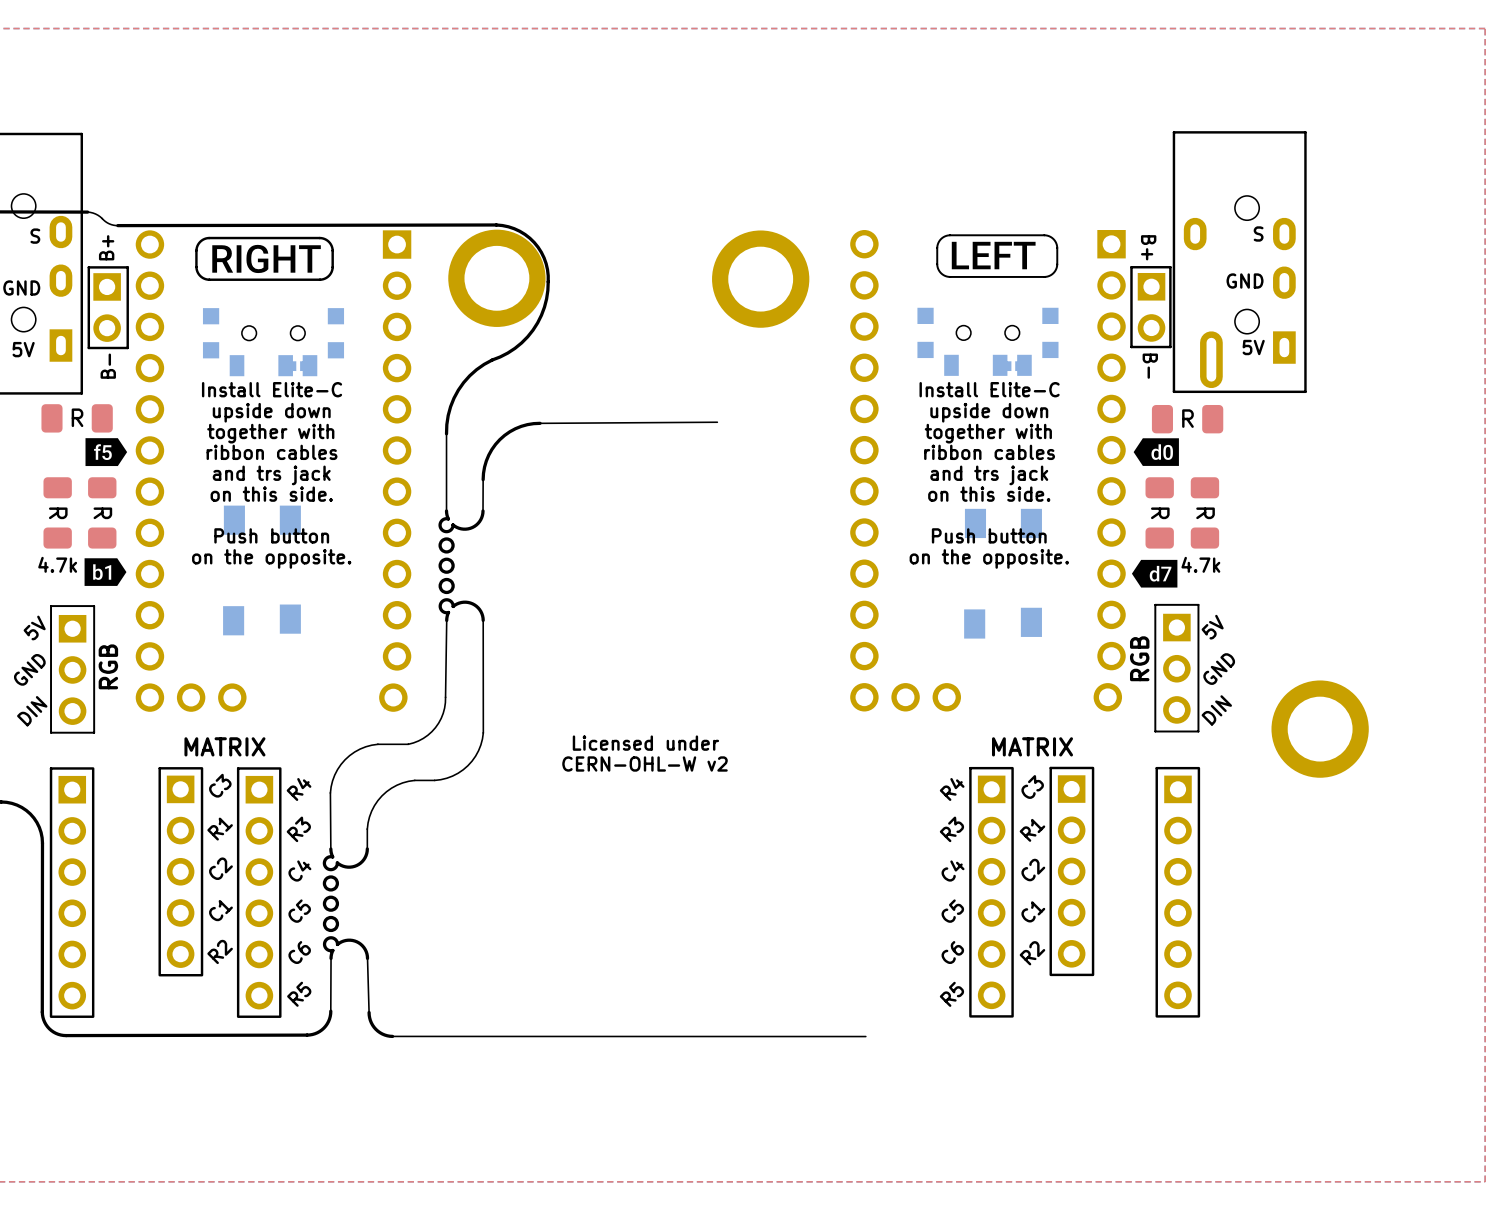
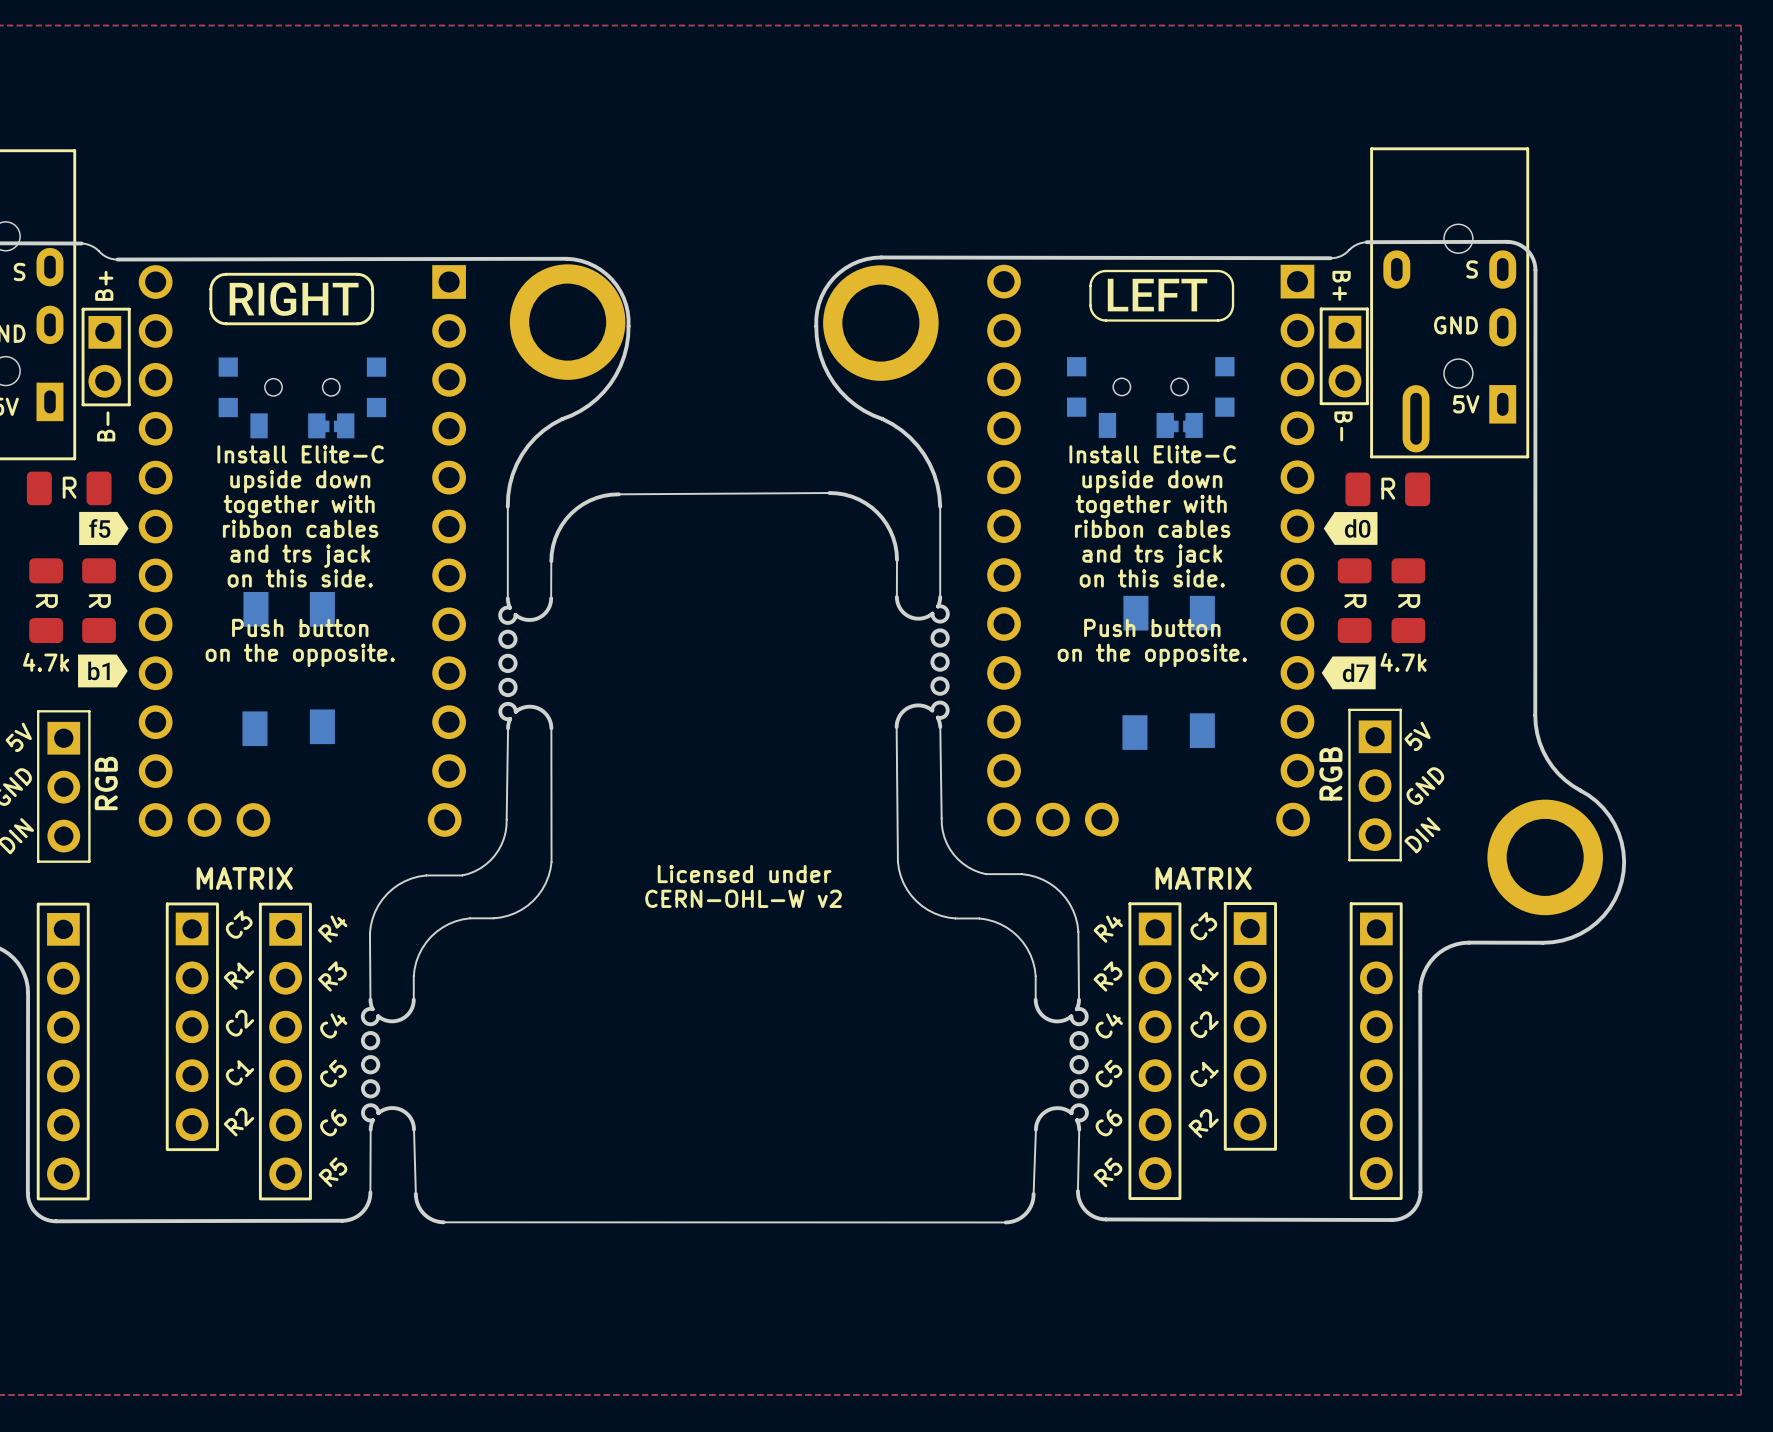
board edge: none -> (829, 493) (844, 494) (865, 503) (877, 512) (886, 524) (895, 544) (897, 599) (902, 611) (914, 618) (922, 618) (932, 613) (937, 621) (945, 619) (947, 610) (942, 606) (938, 606) (940, 597) (939, 495) (929, 464) (917, 445) (901, 430) (864, 410) (840, 391) (828, 375) (818, 346) (816, 318) (821, 296) (829, 283) (839, 272) (859, 261) (881, 257) (1330, 258) (1340, 256) (1354, 245) (1366, 242) (1507, 241) (1524, 247) (1534, 262) (1535, 724) (1539, 742) (1552, 766) (1565, 780) (1588, 795) (1603, 808) (1618, 833) (1623, 852) (1623, 871) (1614, 899) (1596, 922) (1571, 937) (1552, 942) (1456, 944) (1439, 952) (1426, 967) (1421, 978) (1420, 991) (1420, 1195) (1414, 1209) (1404, 1217) (1392, 1220) (1106, 1219) (1096, 1217) (1083, 1208) (1078, 1194) (1079, 1129) (1077, 1120) (1084, 1118) (1086, 1112) (1084, 1107) (1079, 1105) (1074, 1107) (1071, 1113) (1061, 1108) (1050, 1109) (1043, 1113) (1038, 1119) (1036, 1127) (1032, 1203) (1023, 1216) (1014, 1220) (1005, 1222)
round board edge: none -> [930, 628, 950, 648]
round board edge: none -> [930, 652, 950, 672]
round board edge: none -> [930, 676, 950, 696]
board edge: none -> (932, 710) (919, 705) (909, 707) (900, 714) (896, 724) (897, 862) (903, 883) (916, 901) (934, 913) (955, 918) (986, 919) (1000, 924) (1012, 931) (1027, 948) (1033, 961) (1035, 976) (1035, 1002) (1039, 1012) (1050, 1020) (1061, 1021) (1071, 1016) (1074, 1022) (1082, 1023) (1086, 1015) (1083, 1010) (1076, 1009) (1079, 999) (1077, 924) (1073, 910) (1065, 898) (1049, 883) (1036, 877) (1021, 874) (985, 874) (973, 870) (957, 859) (946, 843) (941, 824) (940, 727) (937, 717) (945, 716) (947, 709) (944, 704) (939, 702) (934, 705) (932, 710)
round board edge: none -> [1069, 1031, 1089, 1051]
round board edge: none -> [1069, 1055, 1089, 1075]
round board edge: none -> [1069, 1079, 1089, 1099]

